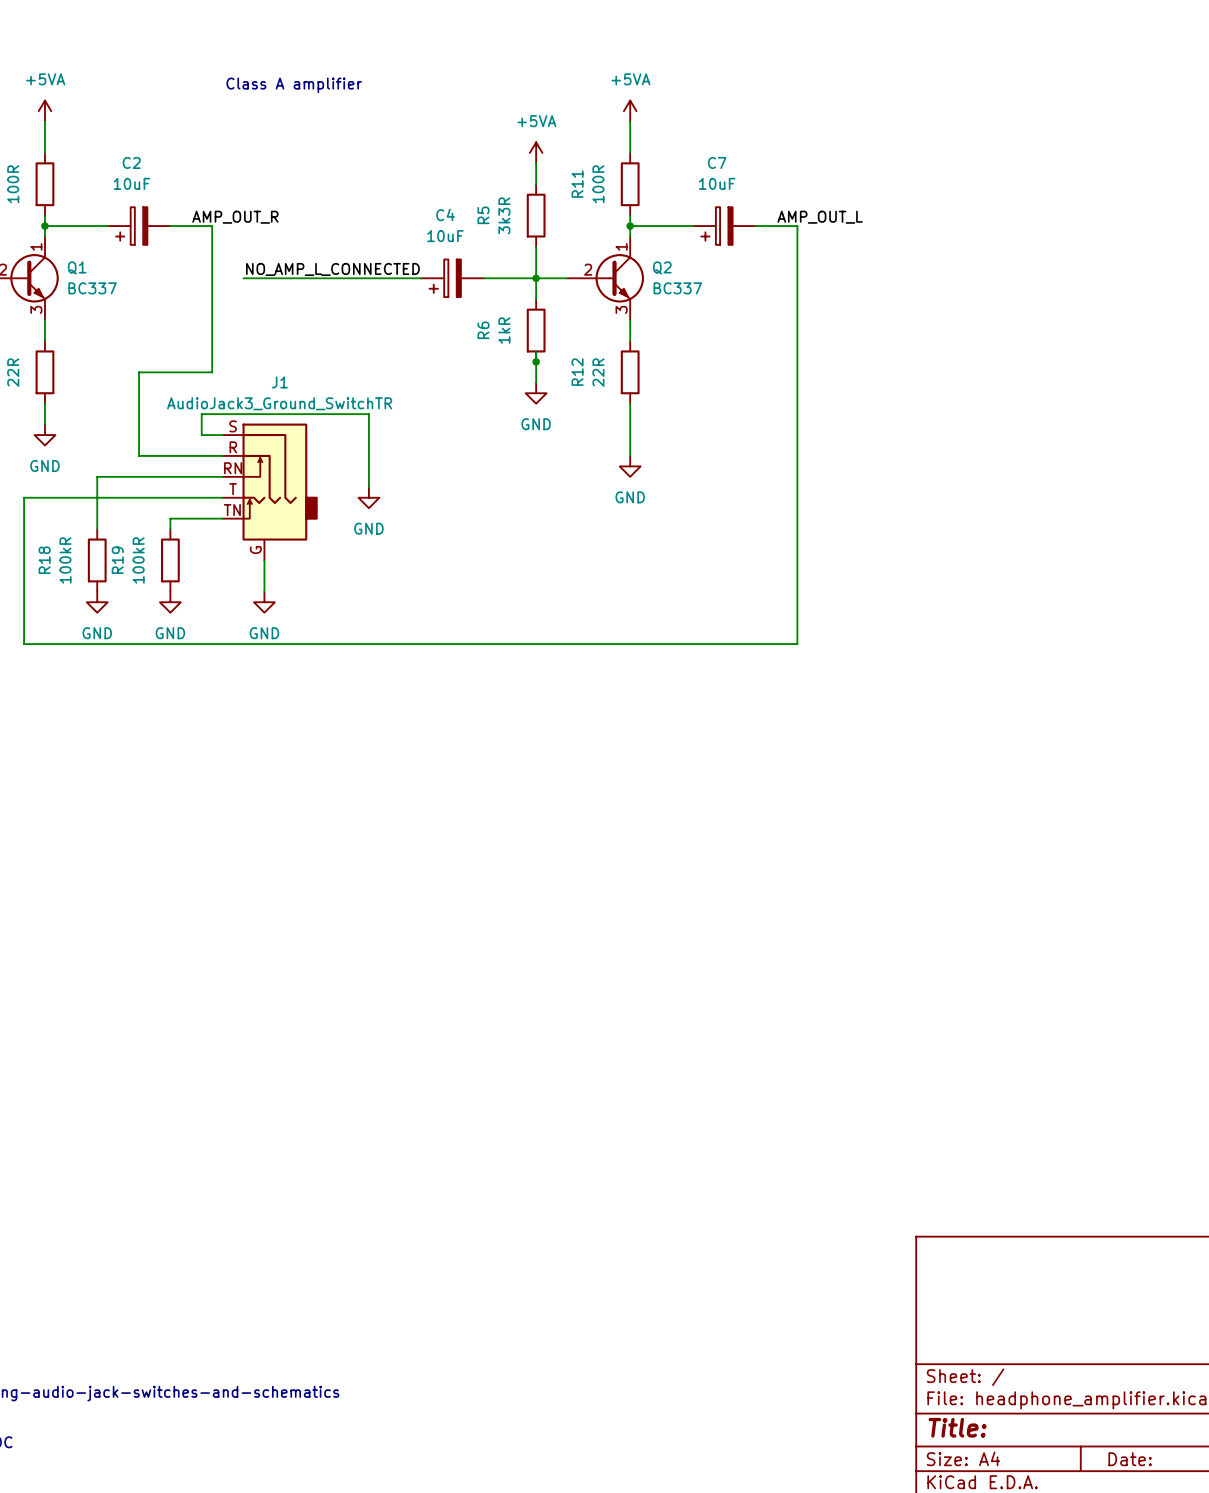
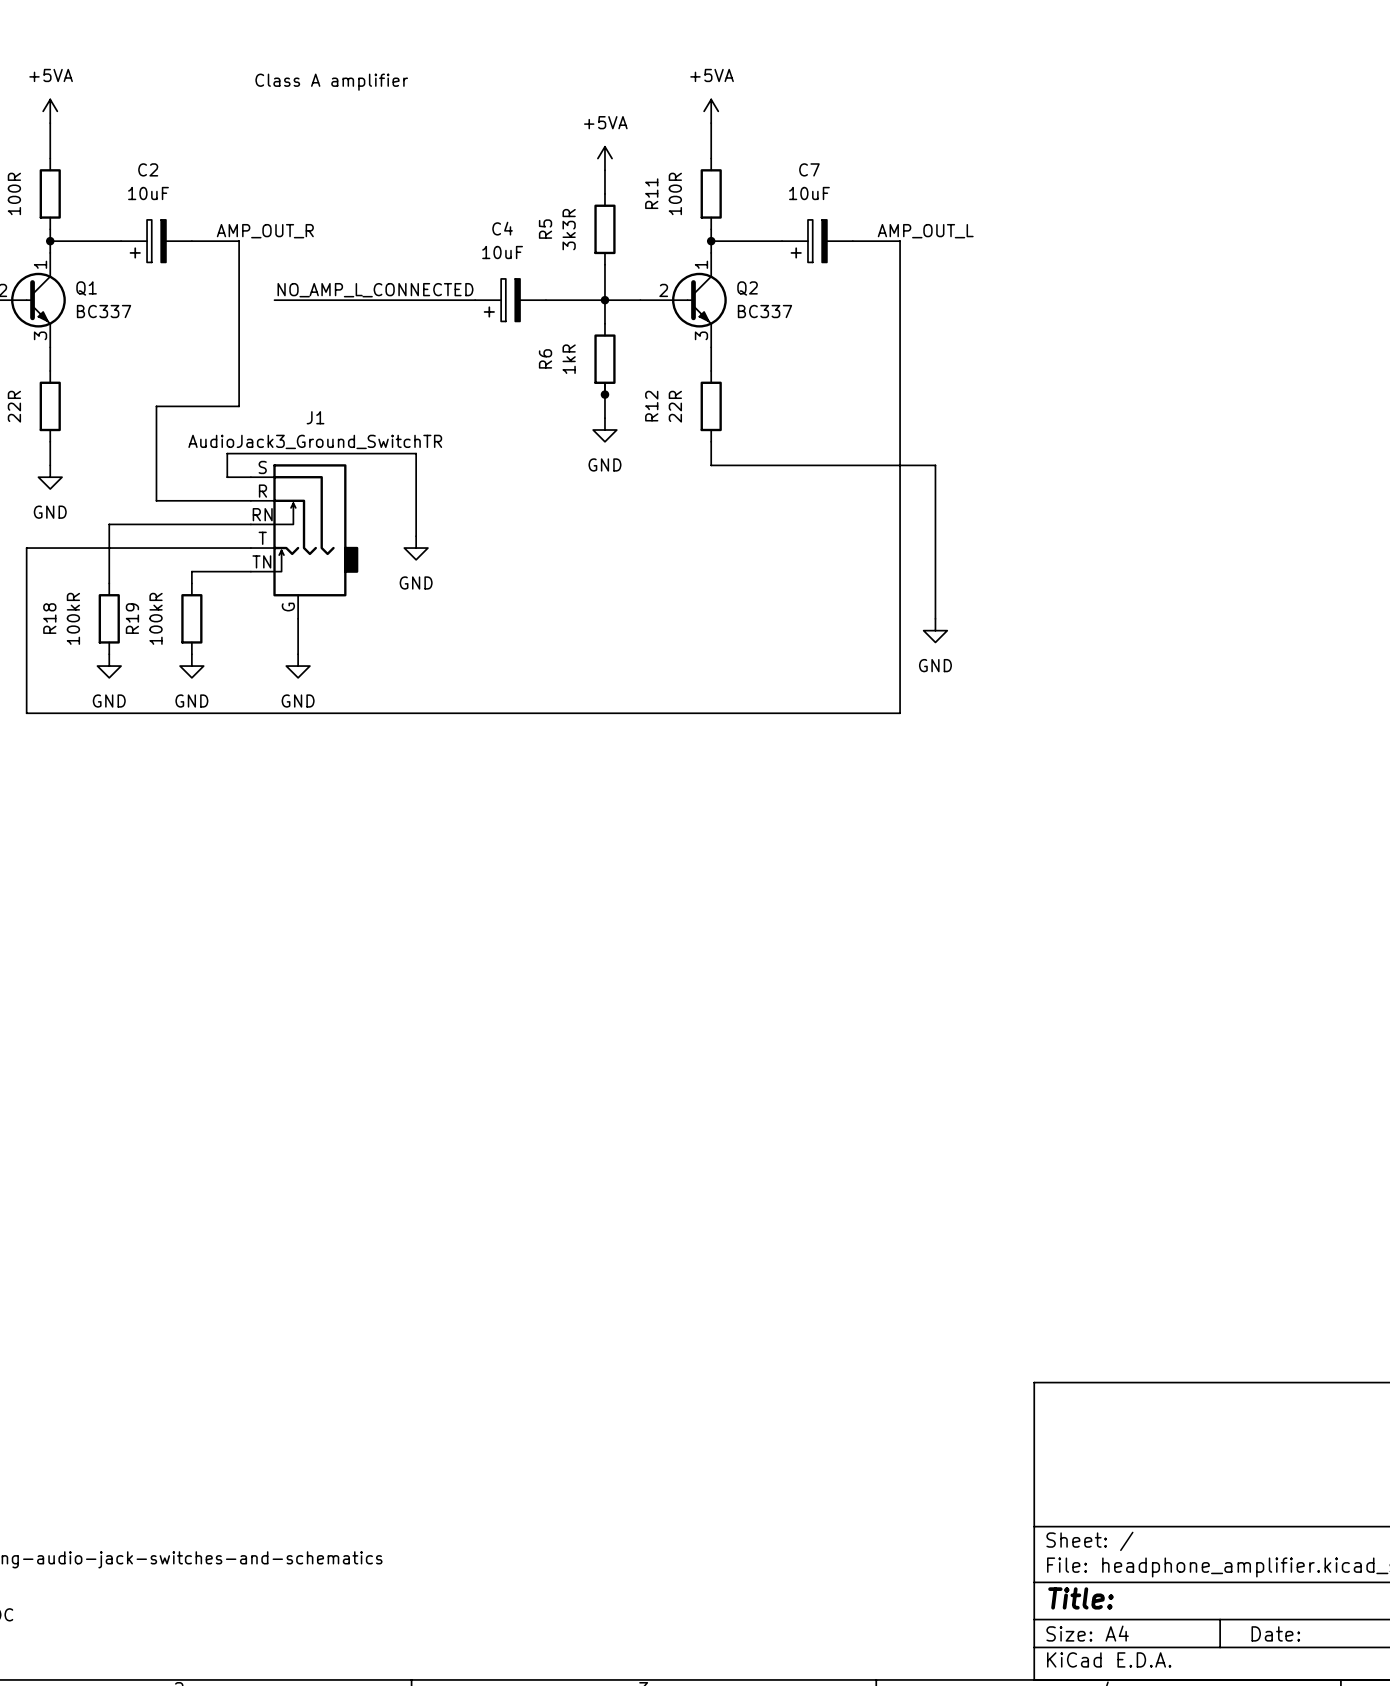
wire: (630, 424) (630, 455) -> (711, 465) (935, 465) (935, 618)
power symbol: GND (630, 466) -> none
power symbol: none -> GND (935, 630)

